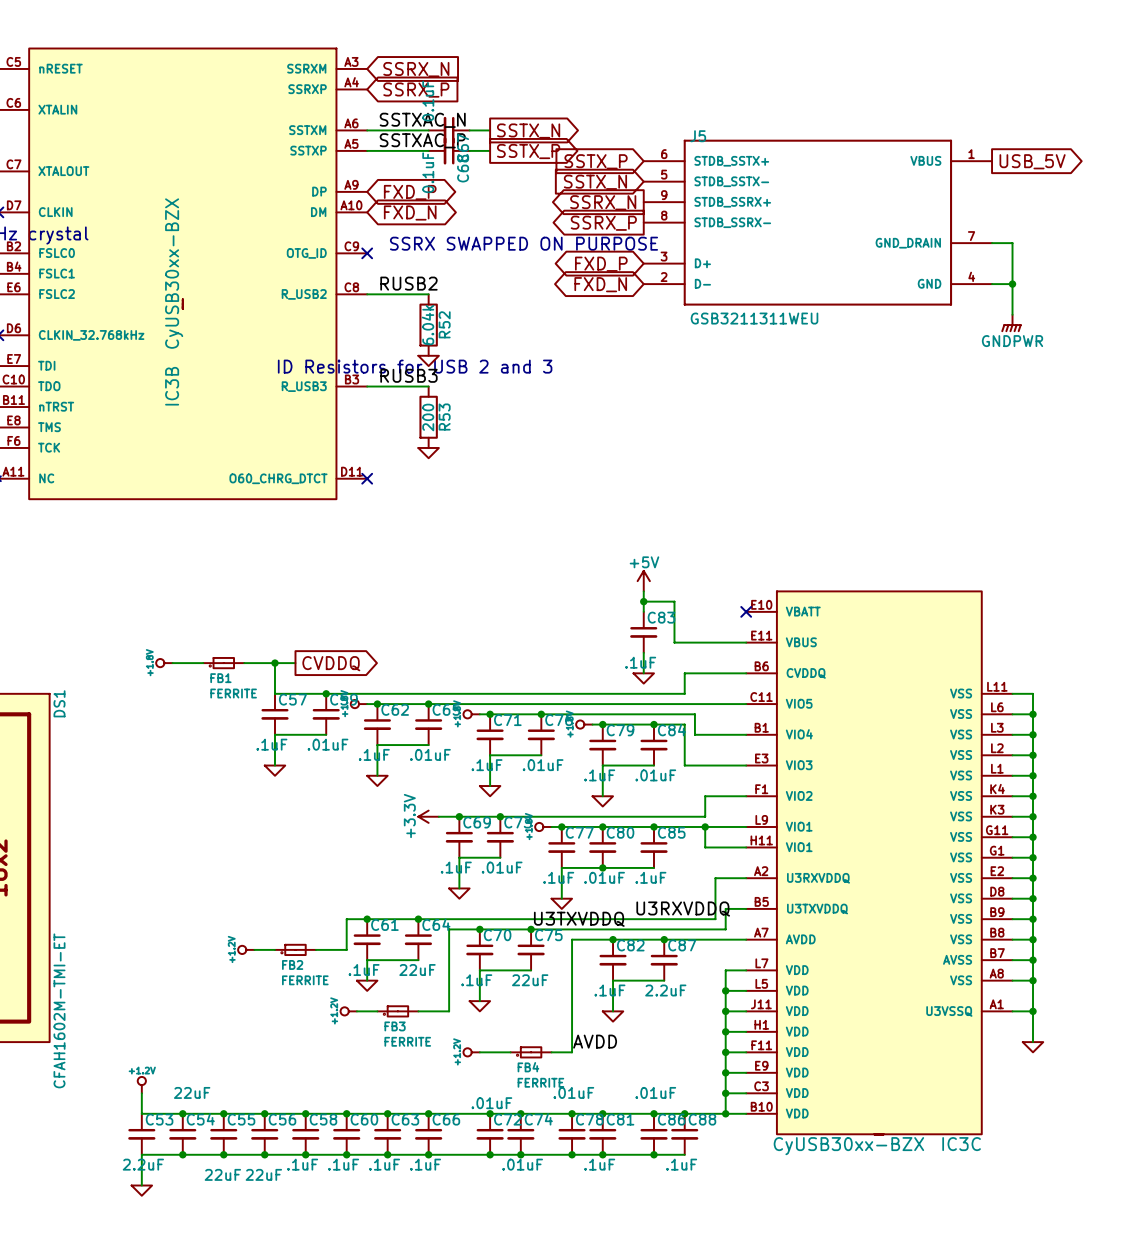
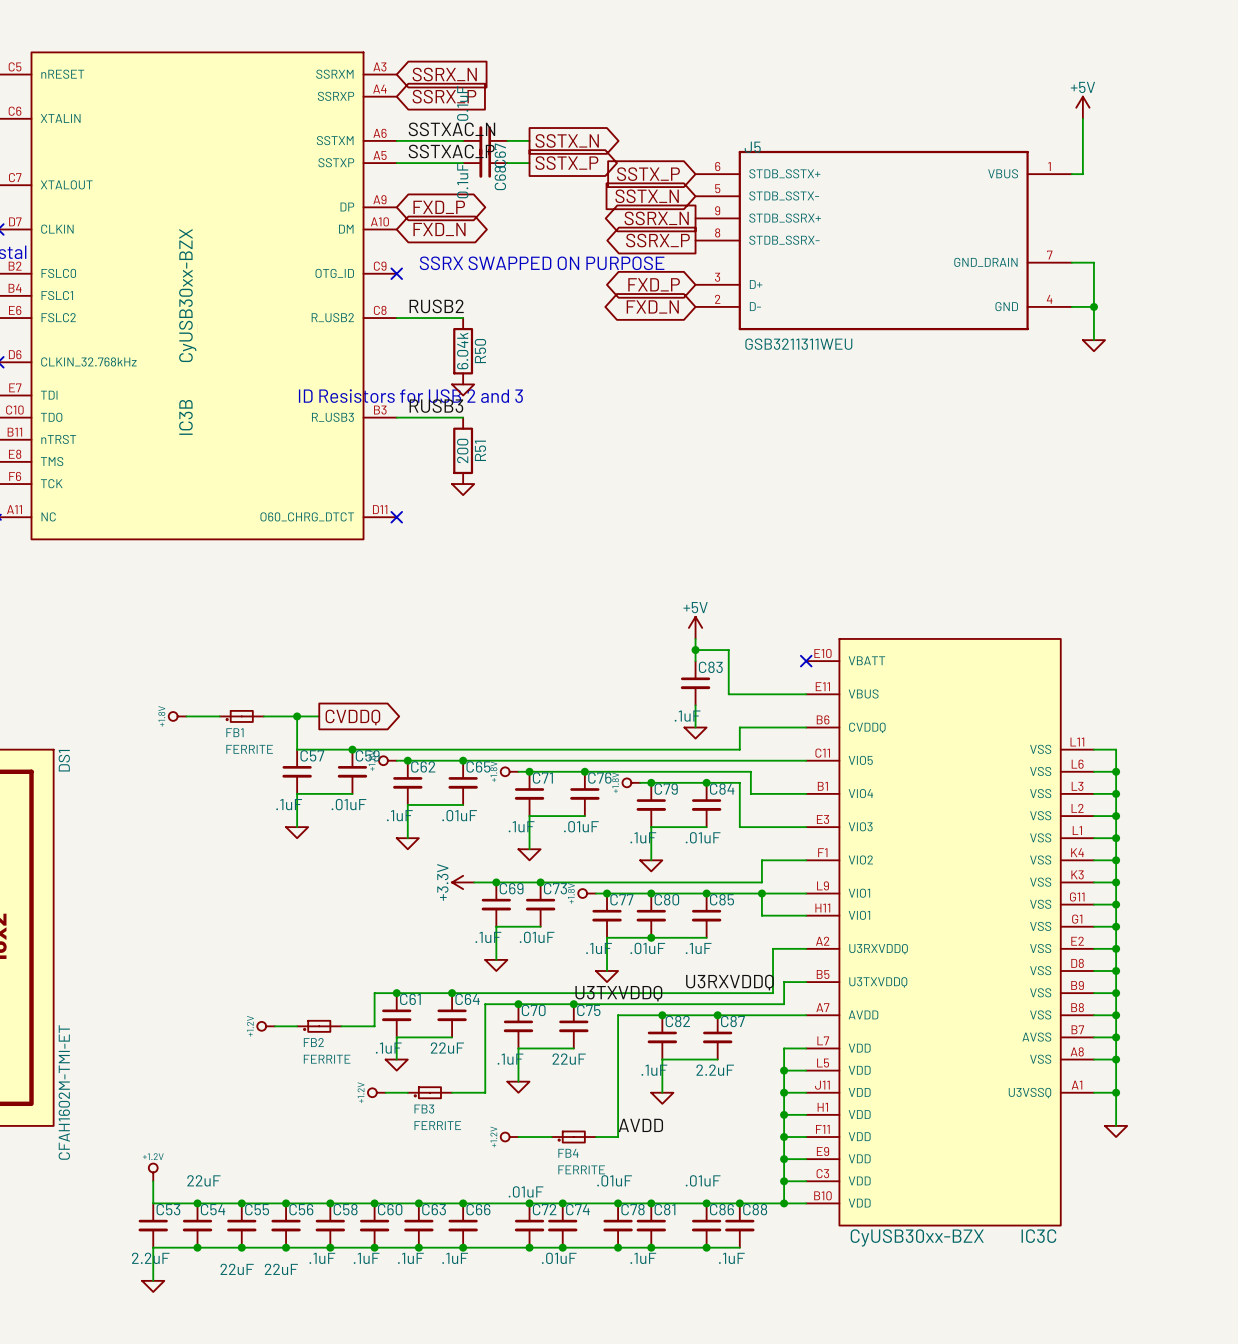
power symbol: none -> +5V (1082, 107)
wire: none -> (1082, 118) (1082, 174) (1071, 174)
global label: USB_5V (1032, 161) -> none
power symbol shape: [1001, 314, 1022, 333] -> [1082, 340, 1106, 352]
R52 name: R52 (444, 324) -> R50 (480, 351)
power symbol text: GNDPWR (1012, 341) -> none
R53 name: R53 (444, 417) -> R51 (480, 450)

